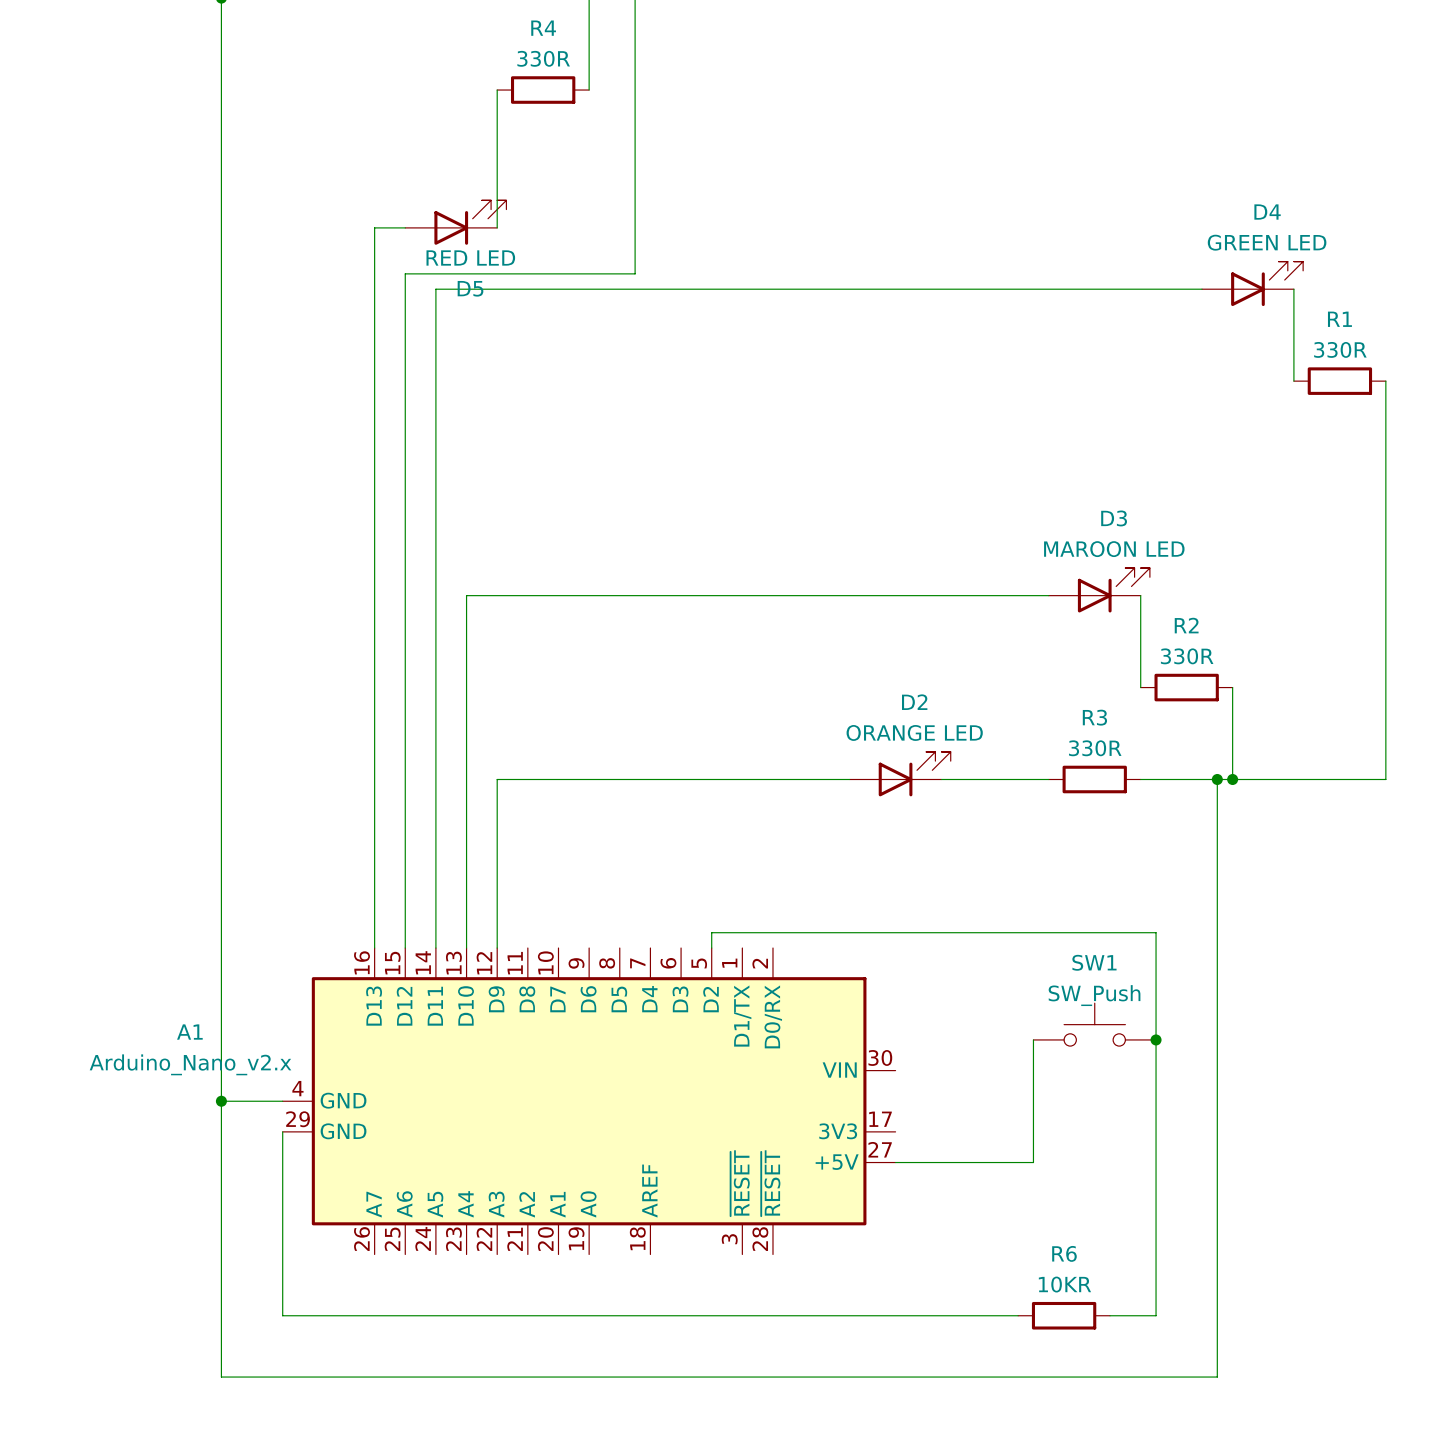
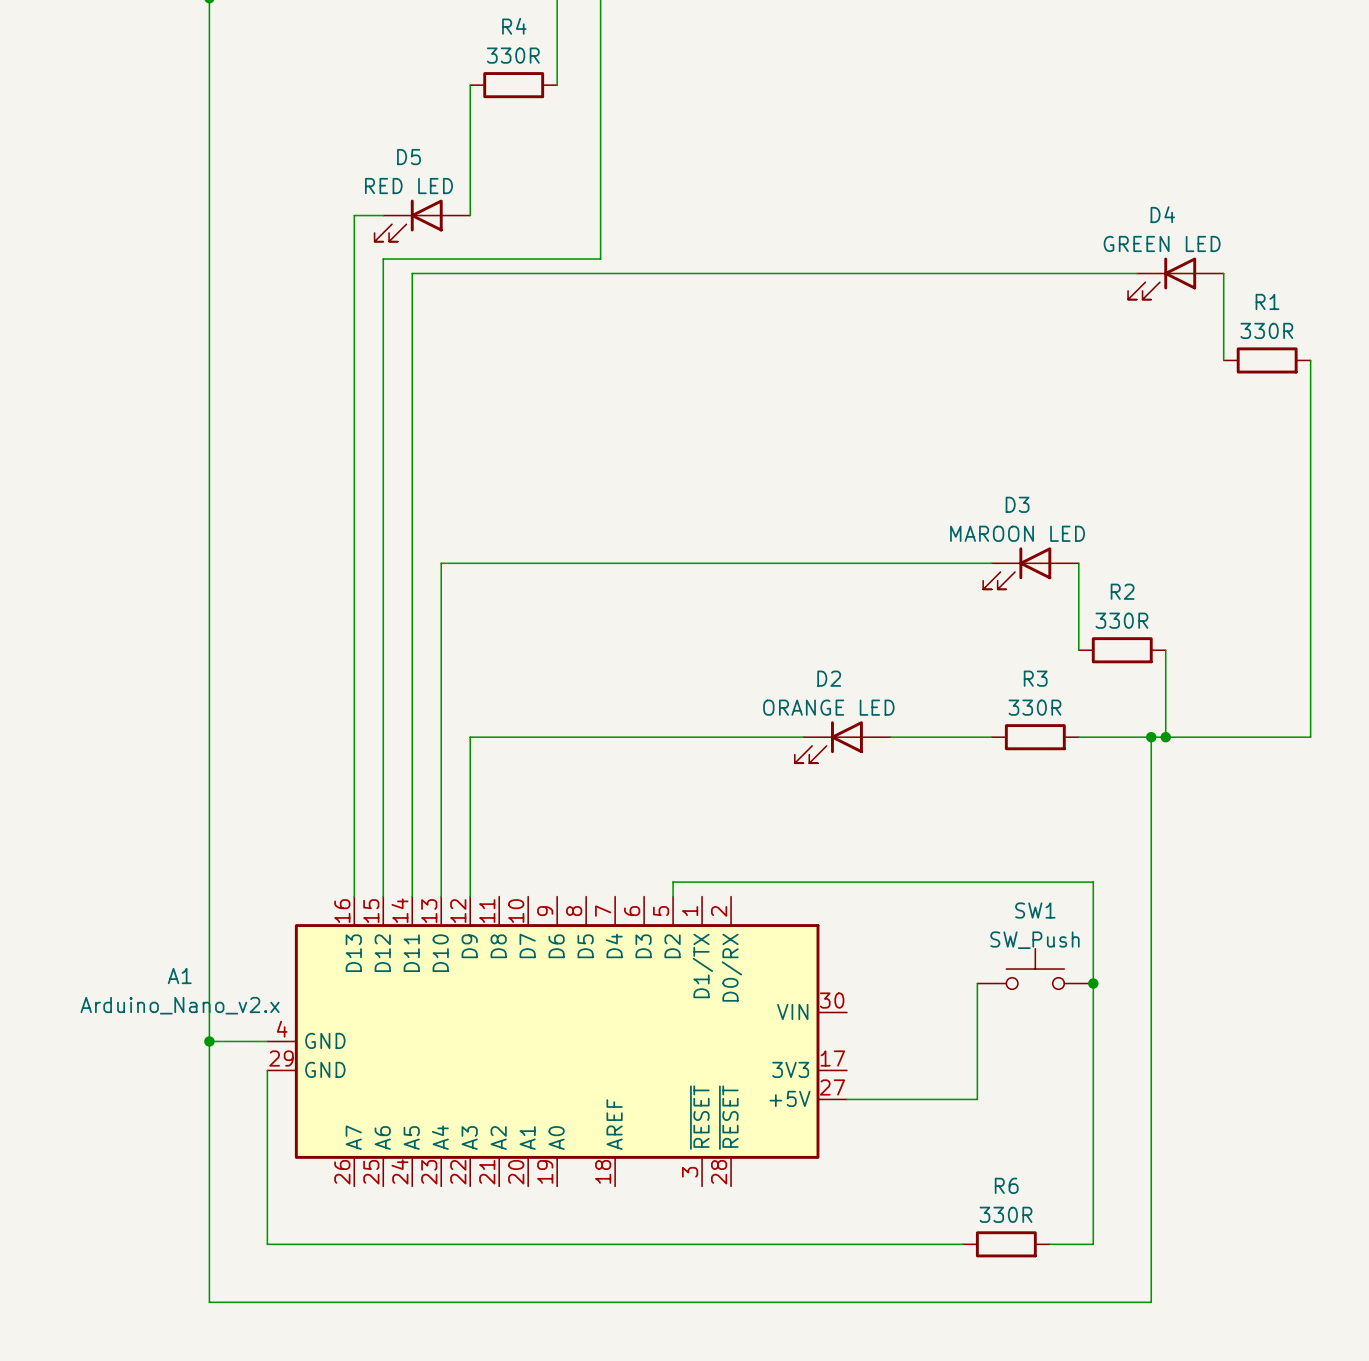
D4 name position: D4 (1267, 212) -> D4 (1162, 214)
D5 rotation: 0° (470, 222) -> 180° (408, 220)
D4 value position: GREEN LED (1267, 242) -> GREEN LED (1162, 243)
D4 rotation: 0° (1267, 283) -> 180° (1162, 278)
D3 name position: D3 (1114, 518) -> D3 (1017, 504)
D3 value position: MAROON LED (1114, 549) -> MAROON LED (1017, 533)
D3 rotation: 0° (1113, 590) -> 180° (1017, 568)
D2 name position: D2 (914, 702) -> D2 (829, 678)
D2 value position: ORANGE LED (914, 732) -> ORANGE LED (828, 707)
D2 rotation: 0° (914, 774) -> 180° (828, 742)
R6 value: 10KR (1064, 1284) -> 330R (1006, 1214)

